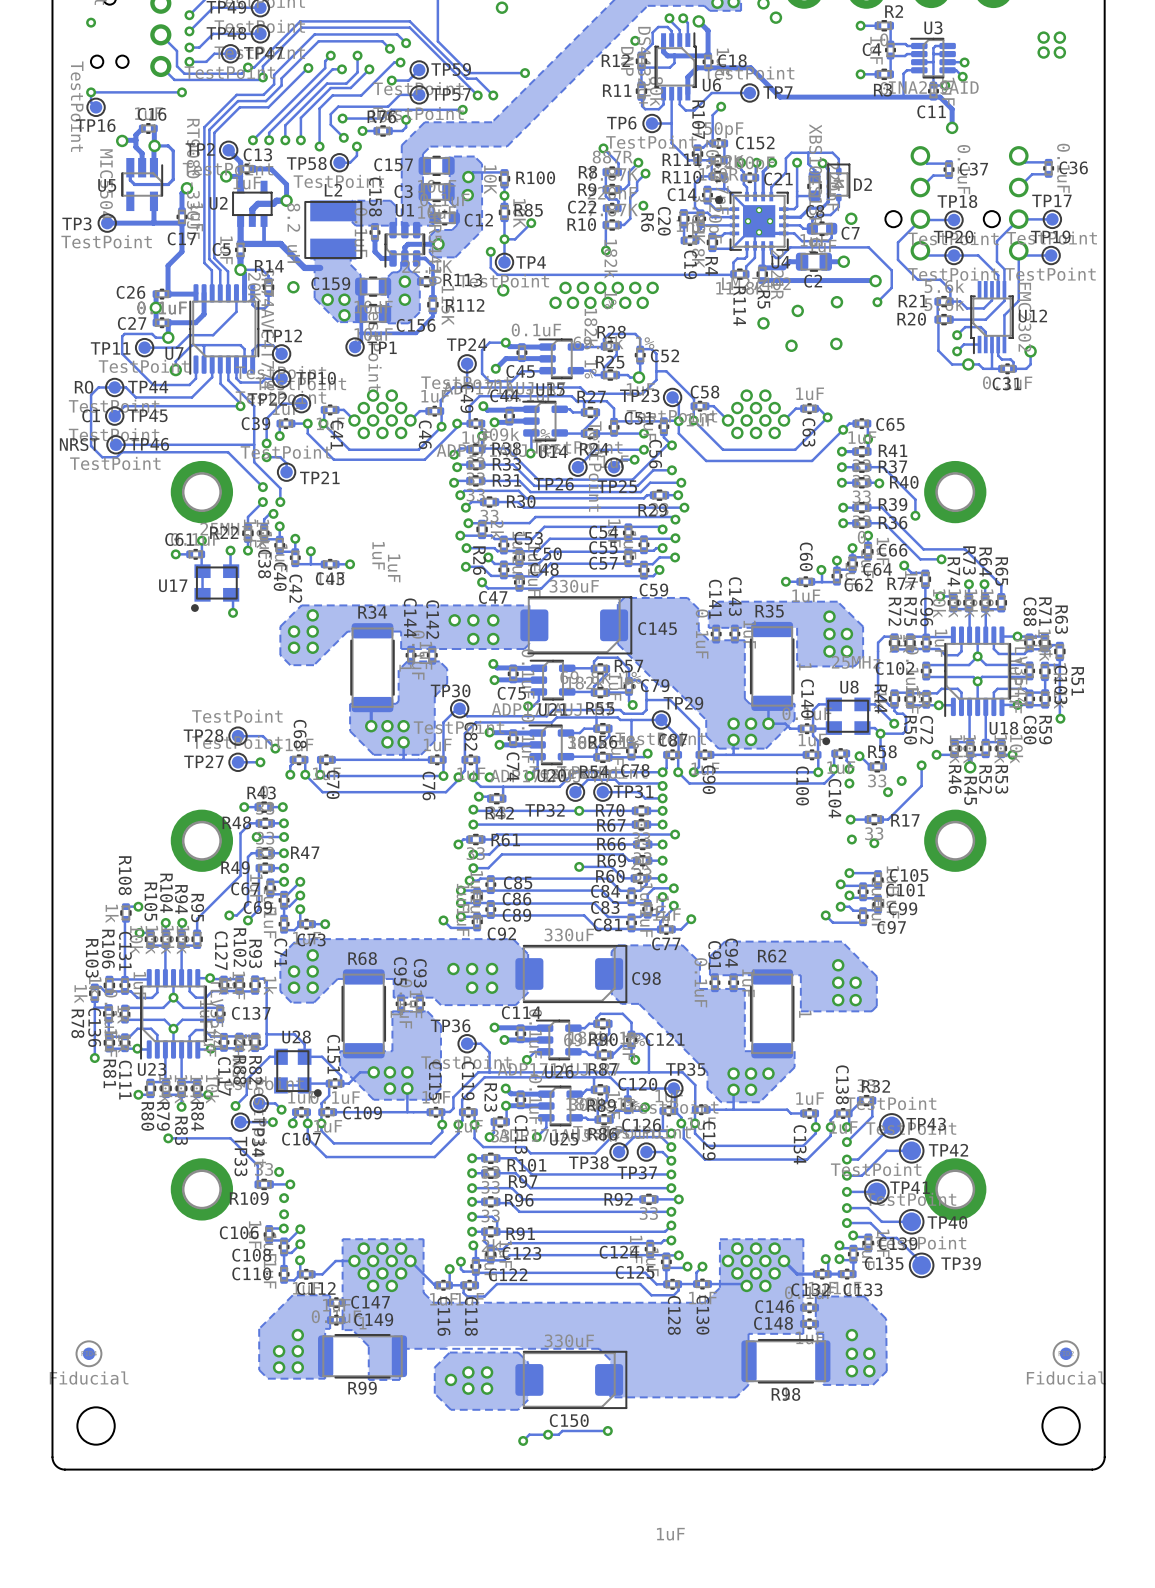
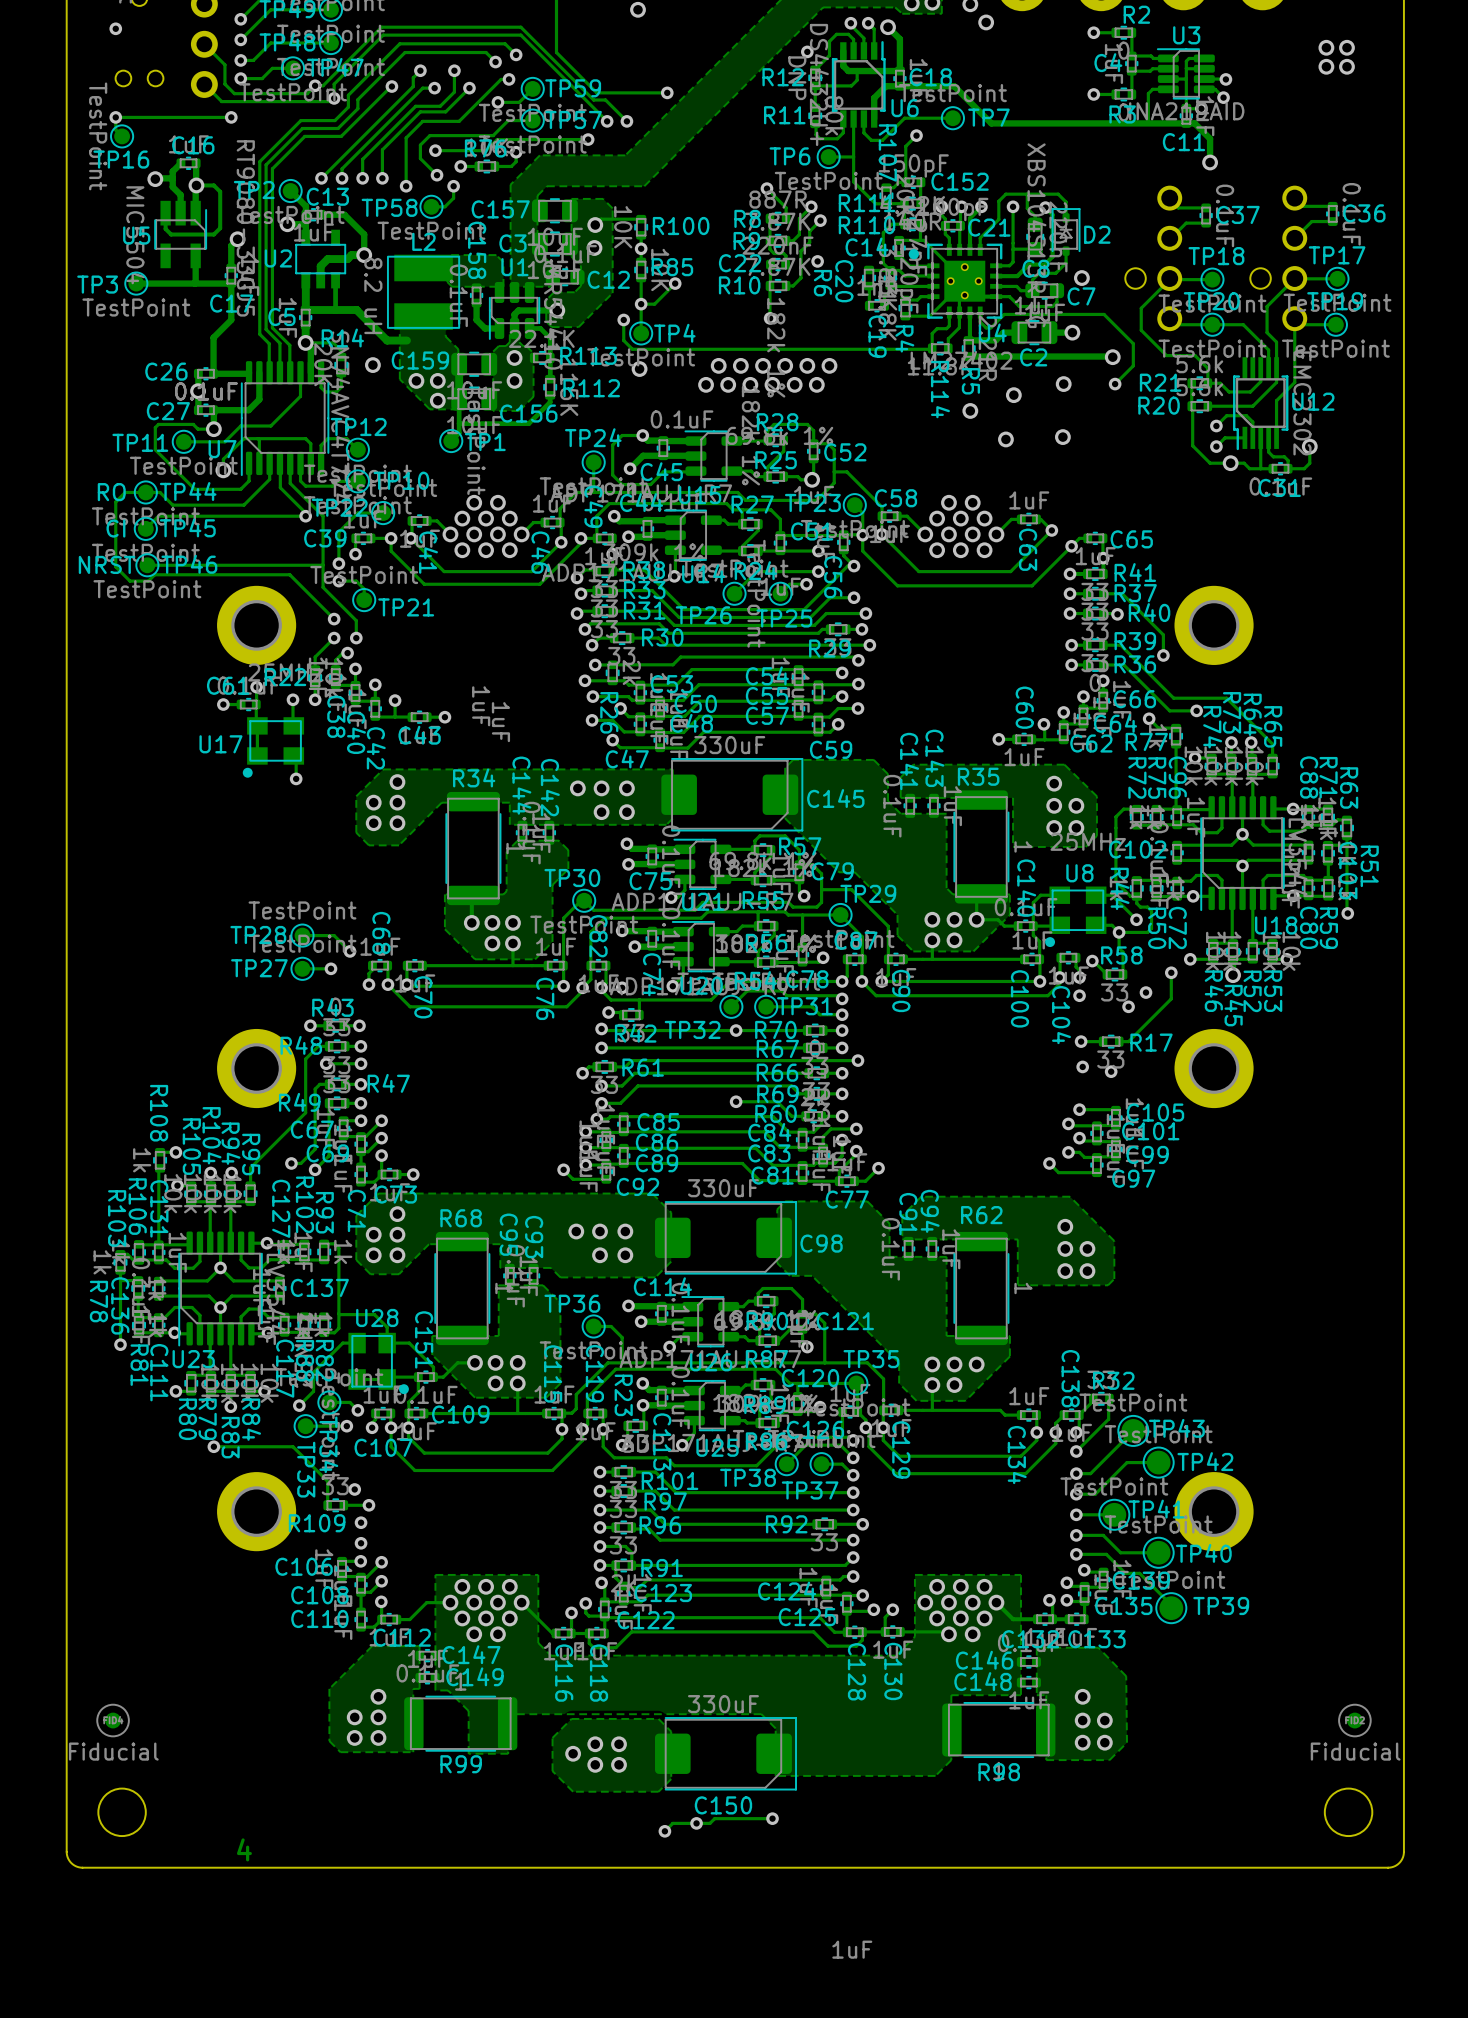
text: none -> 4 (244, 1849)

